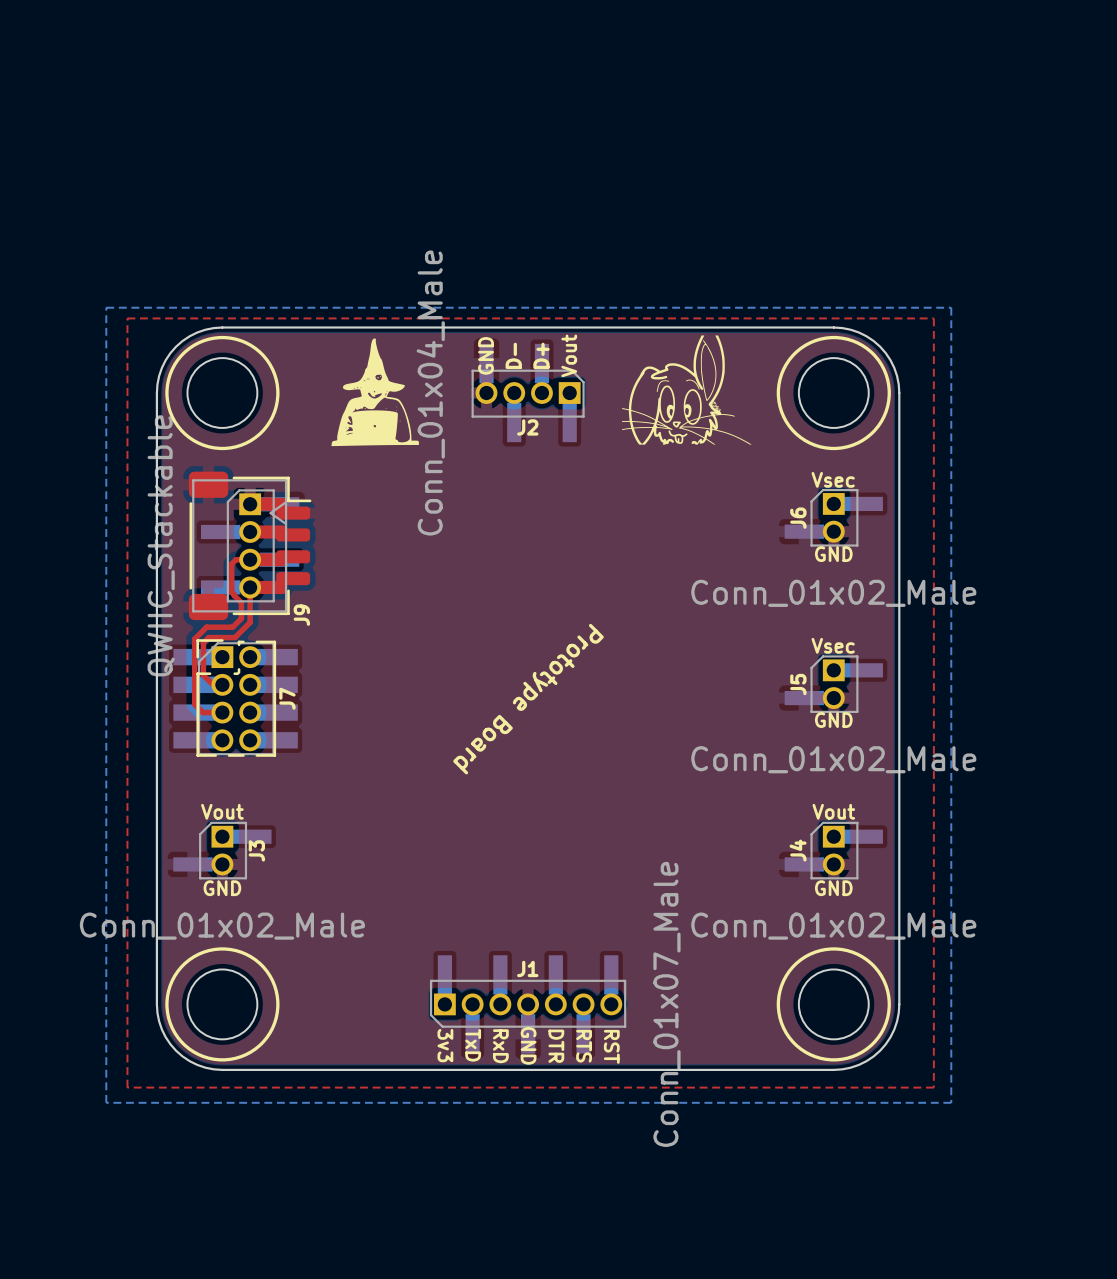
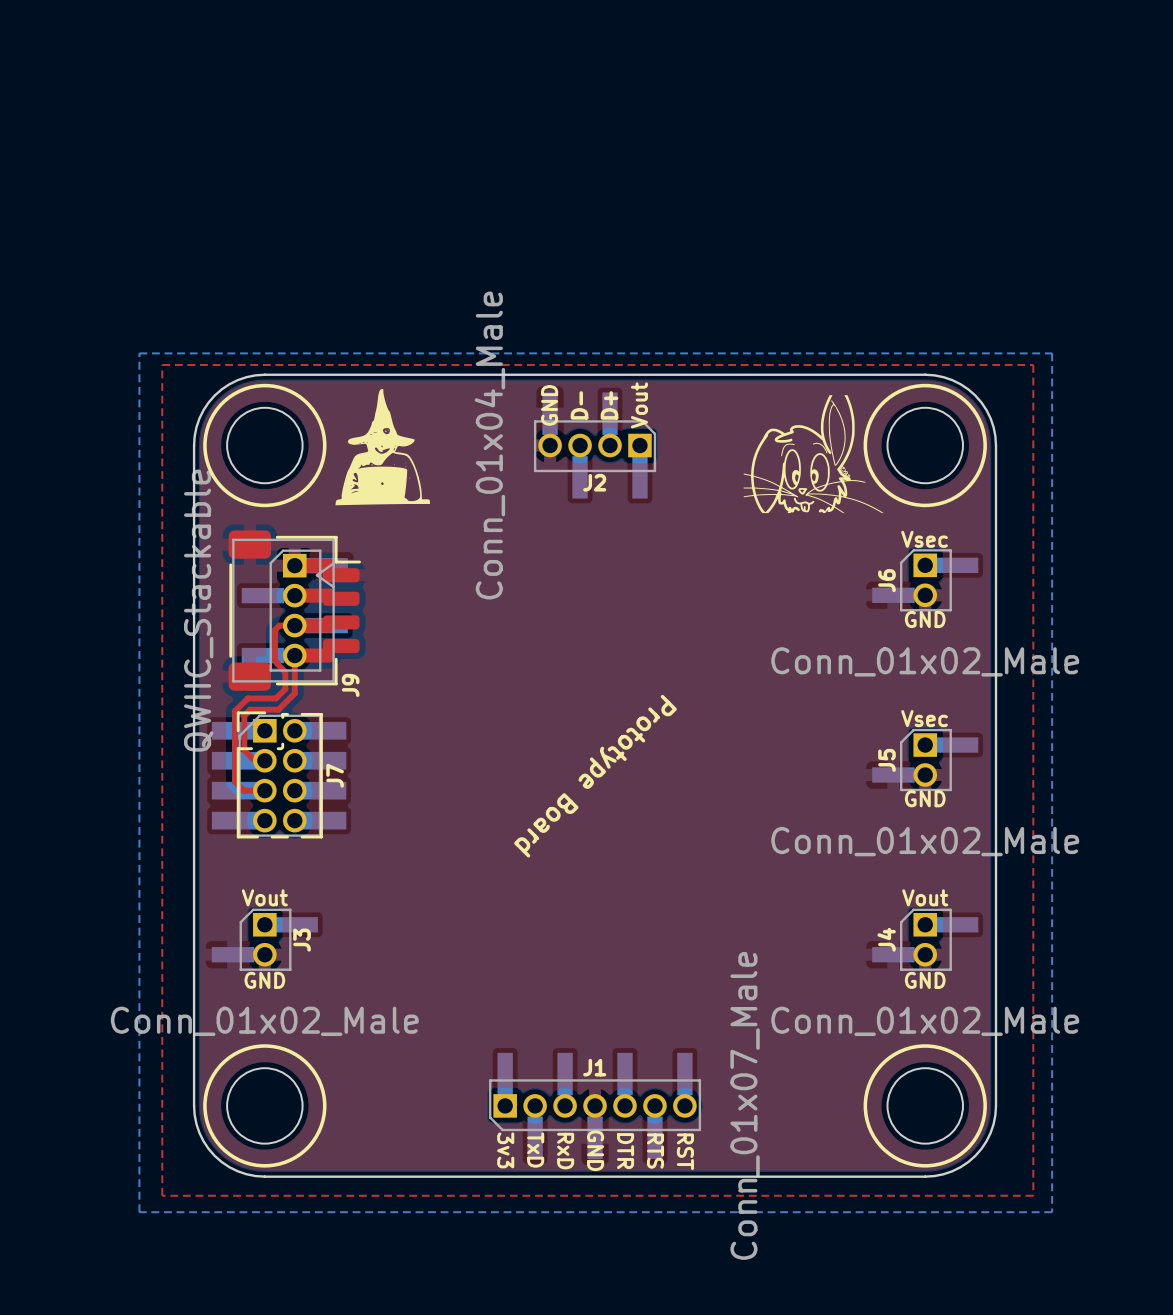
drawing position: (686, 390) -> (813, 454)
drawing position: (375, 392) -> (382, 447)

